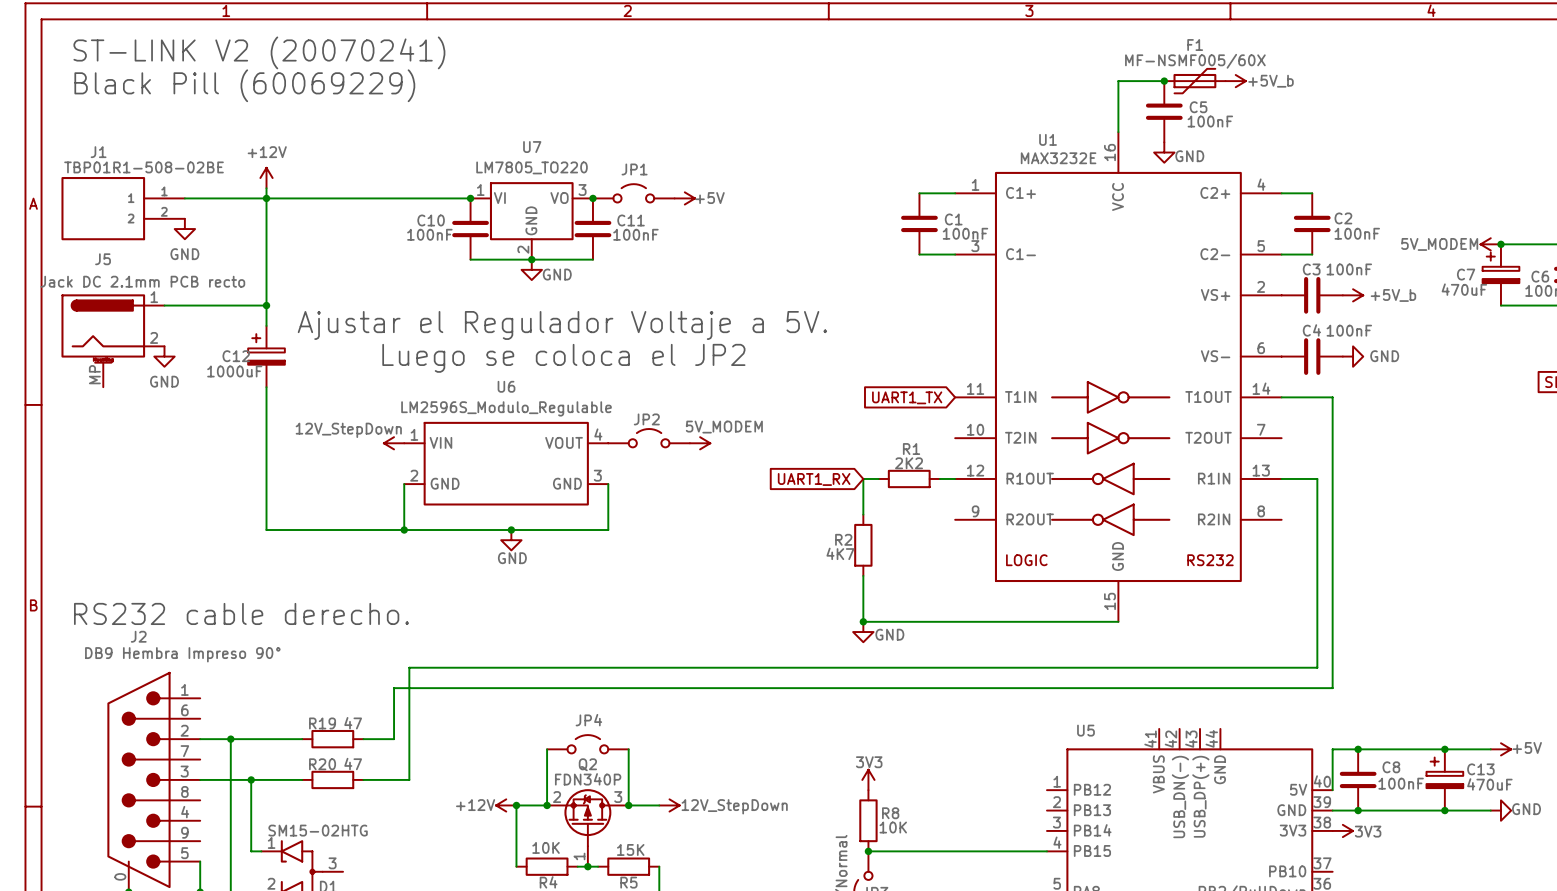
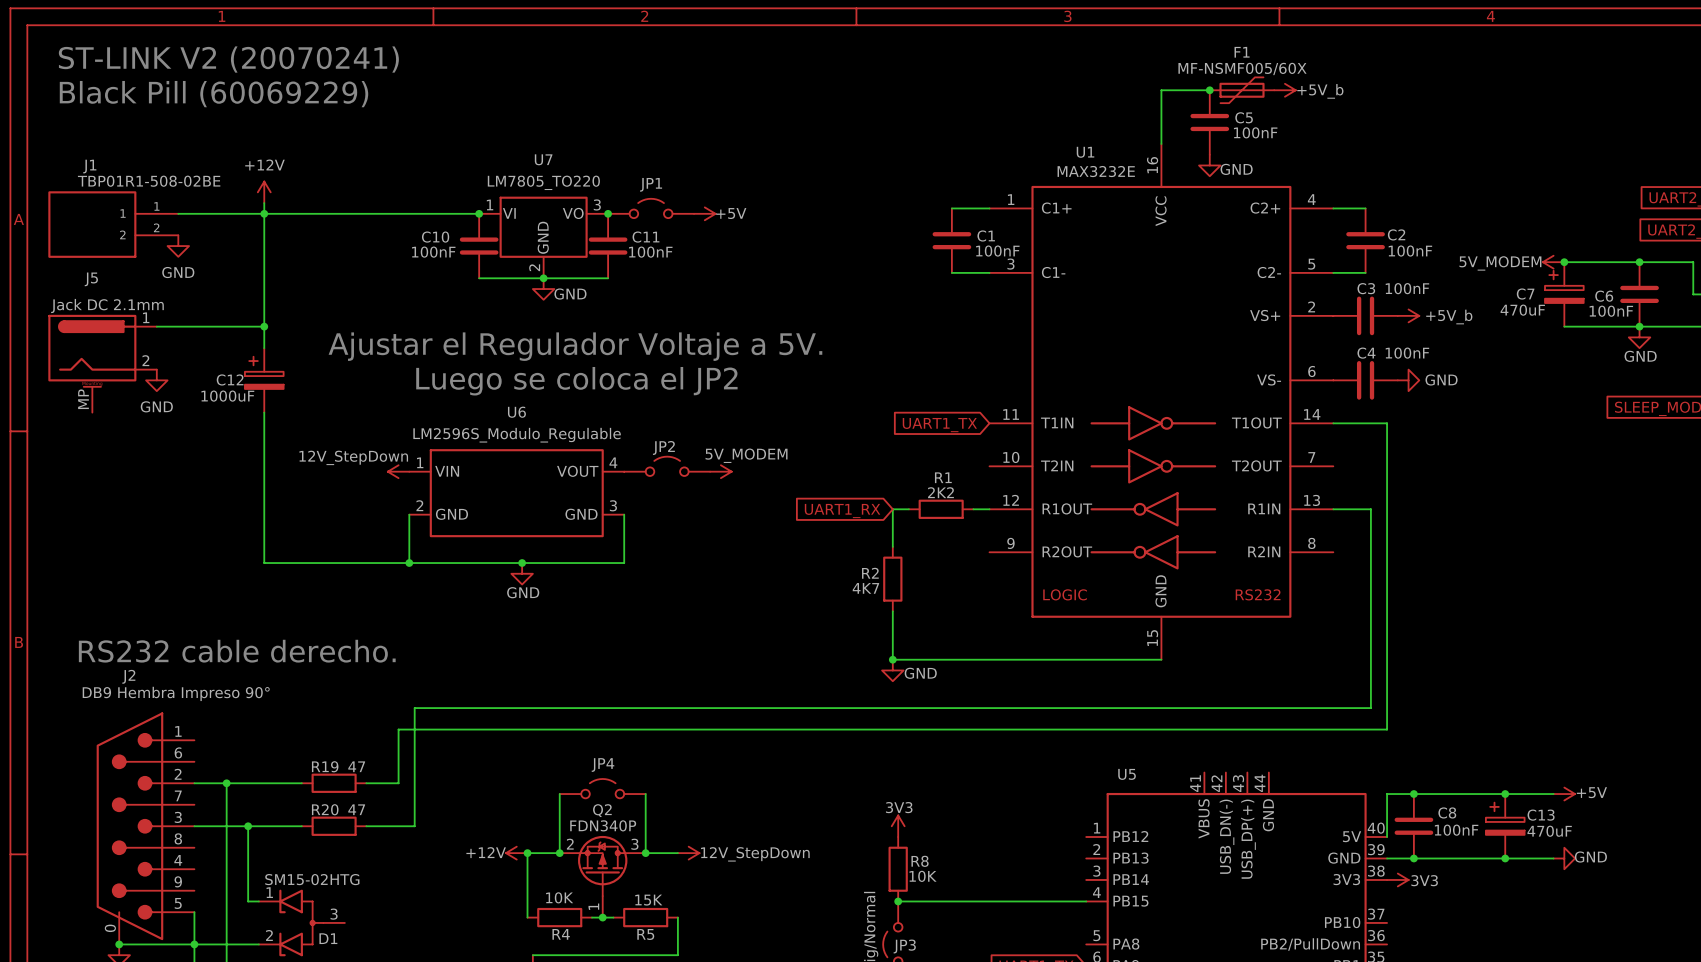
J5 value: Jack DC 2.1mm PCB recto (142, 281) -> Jack DC 2.1mm (107, 306)

